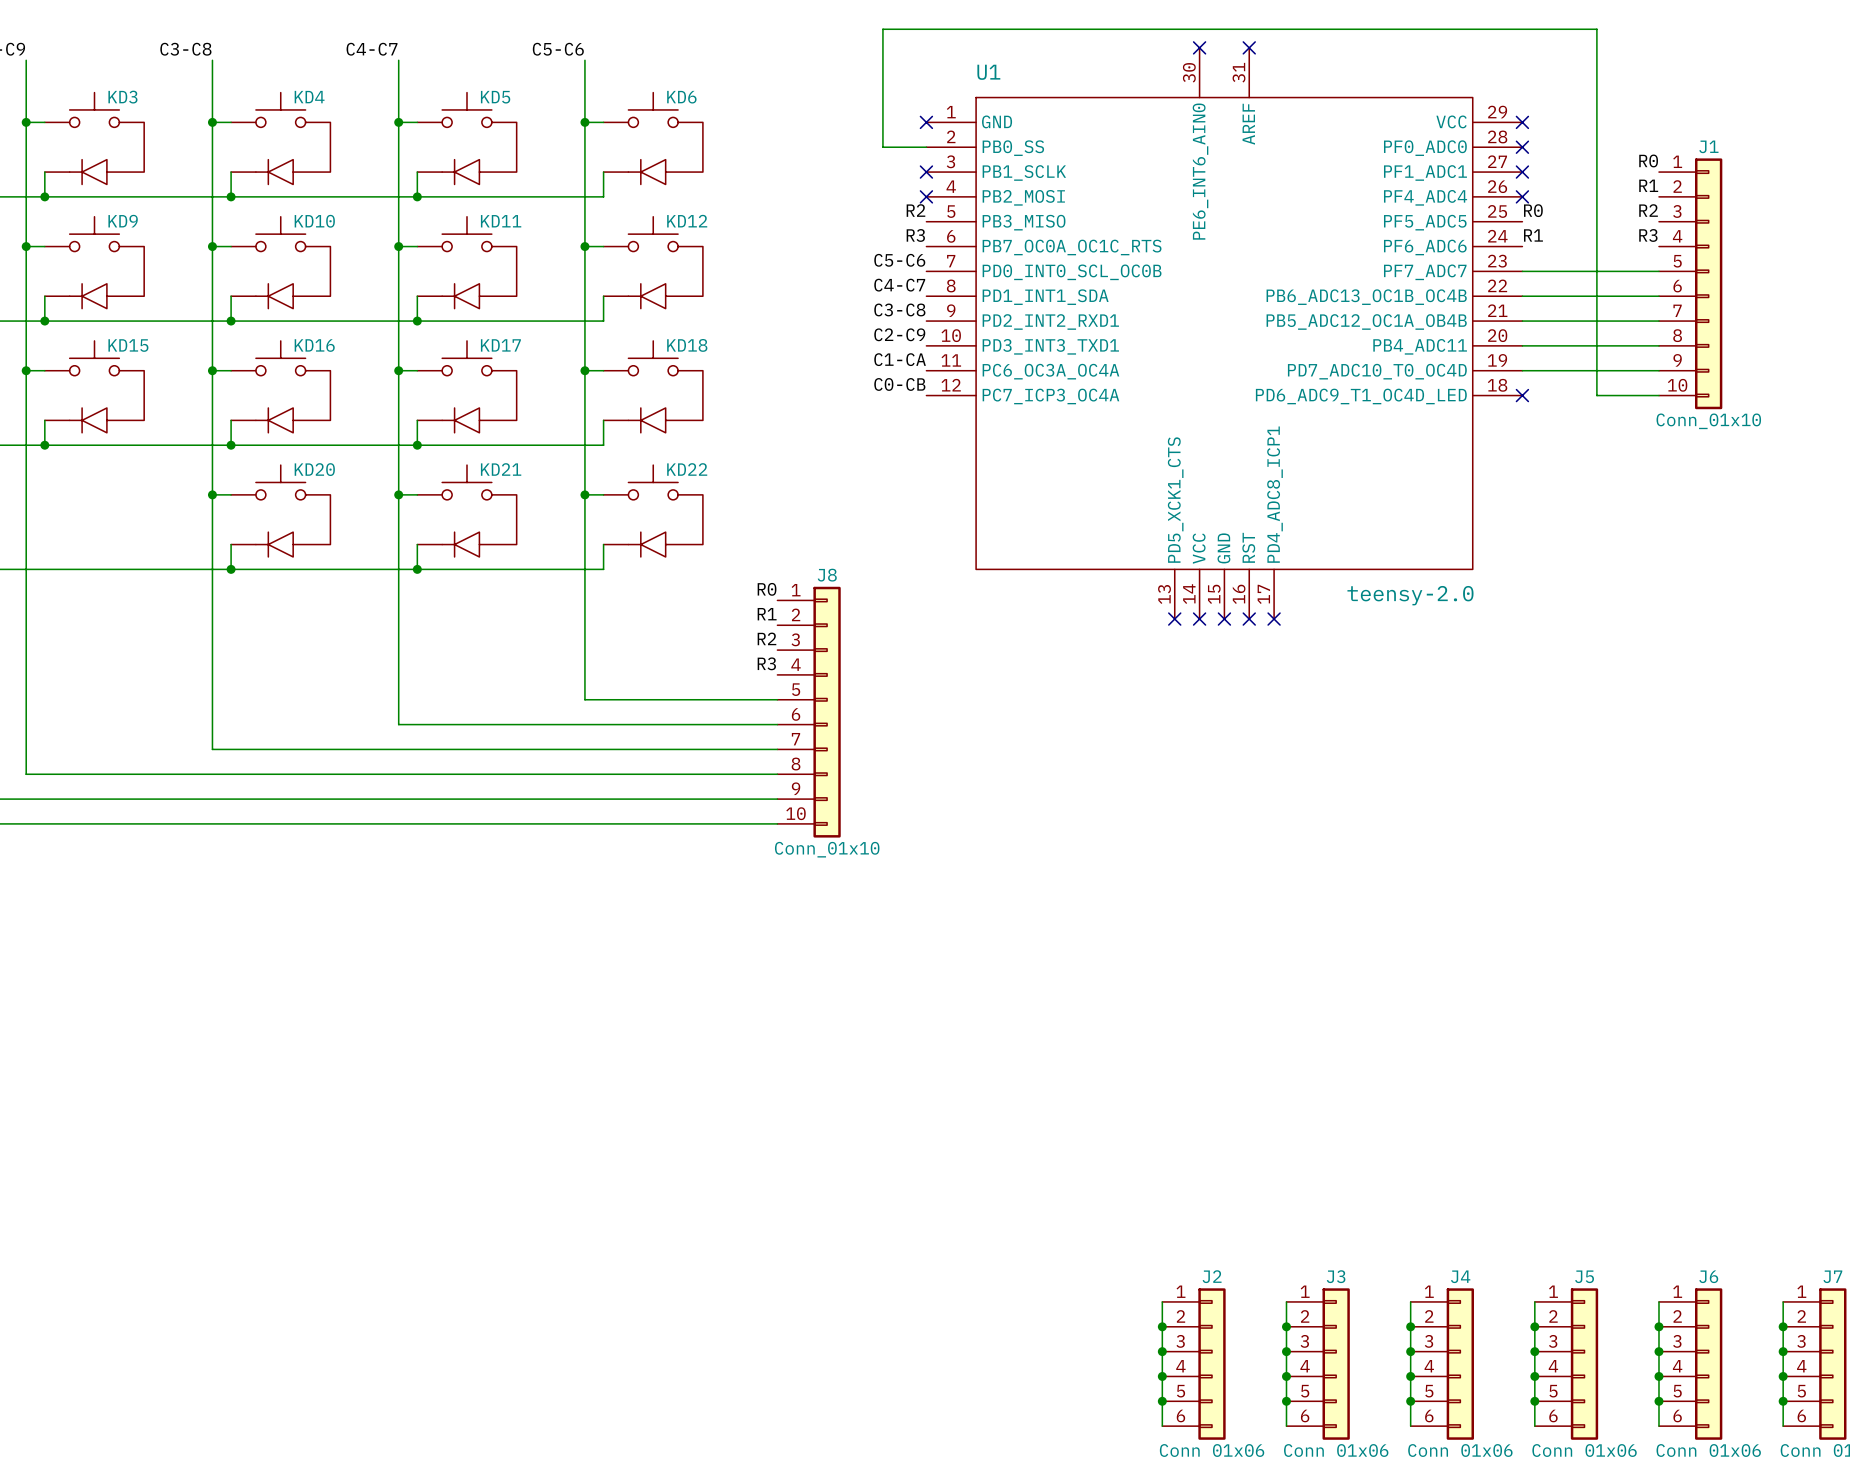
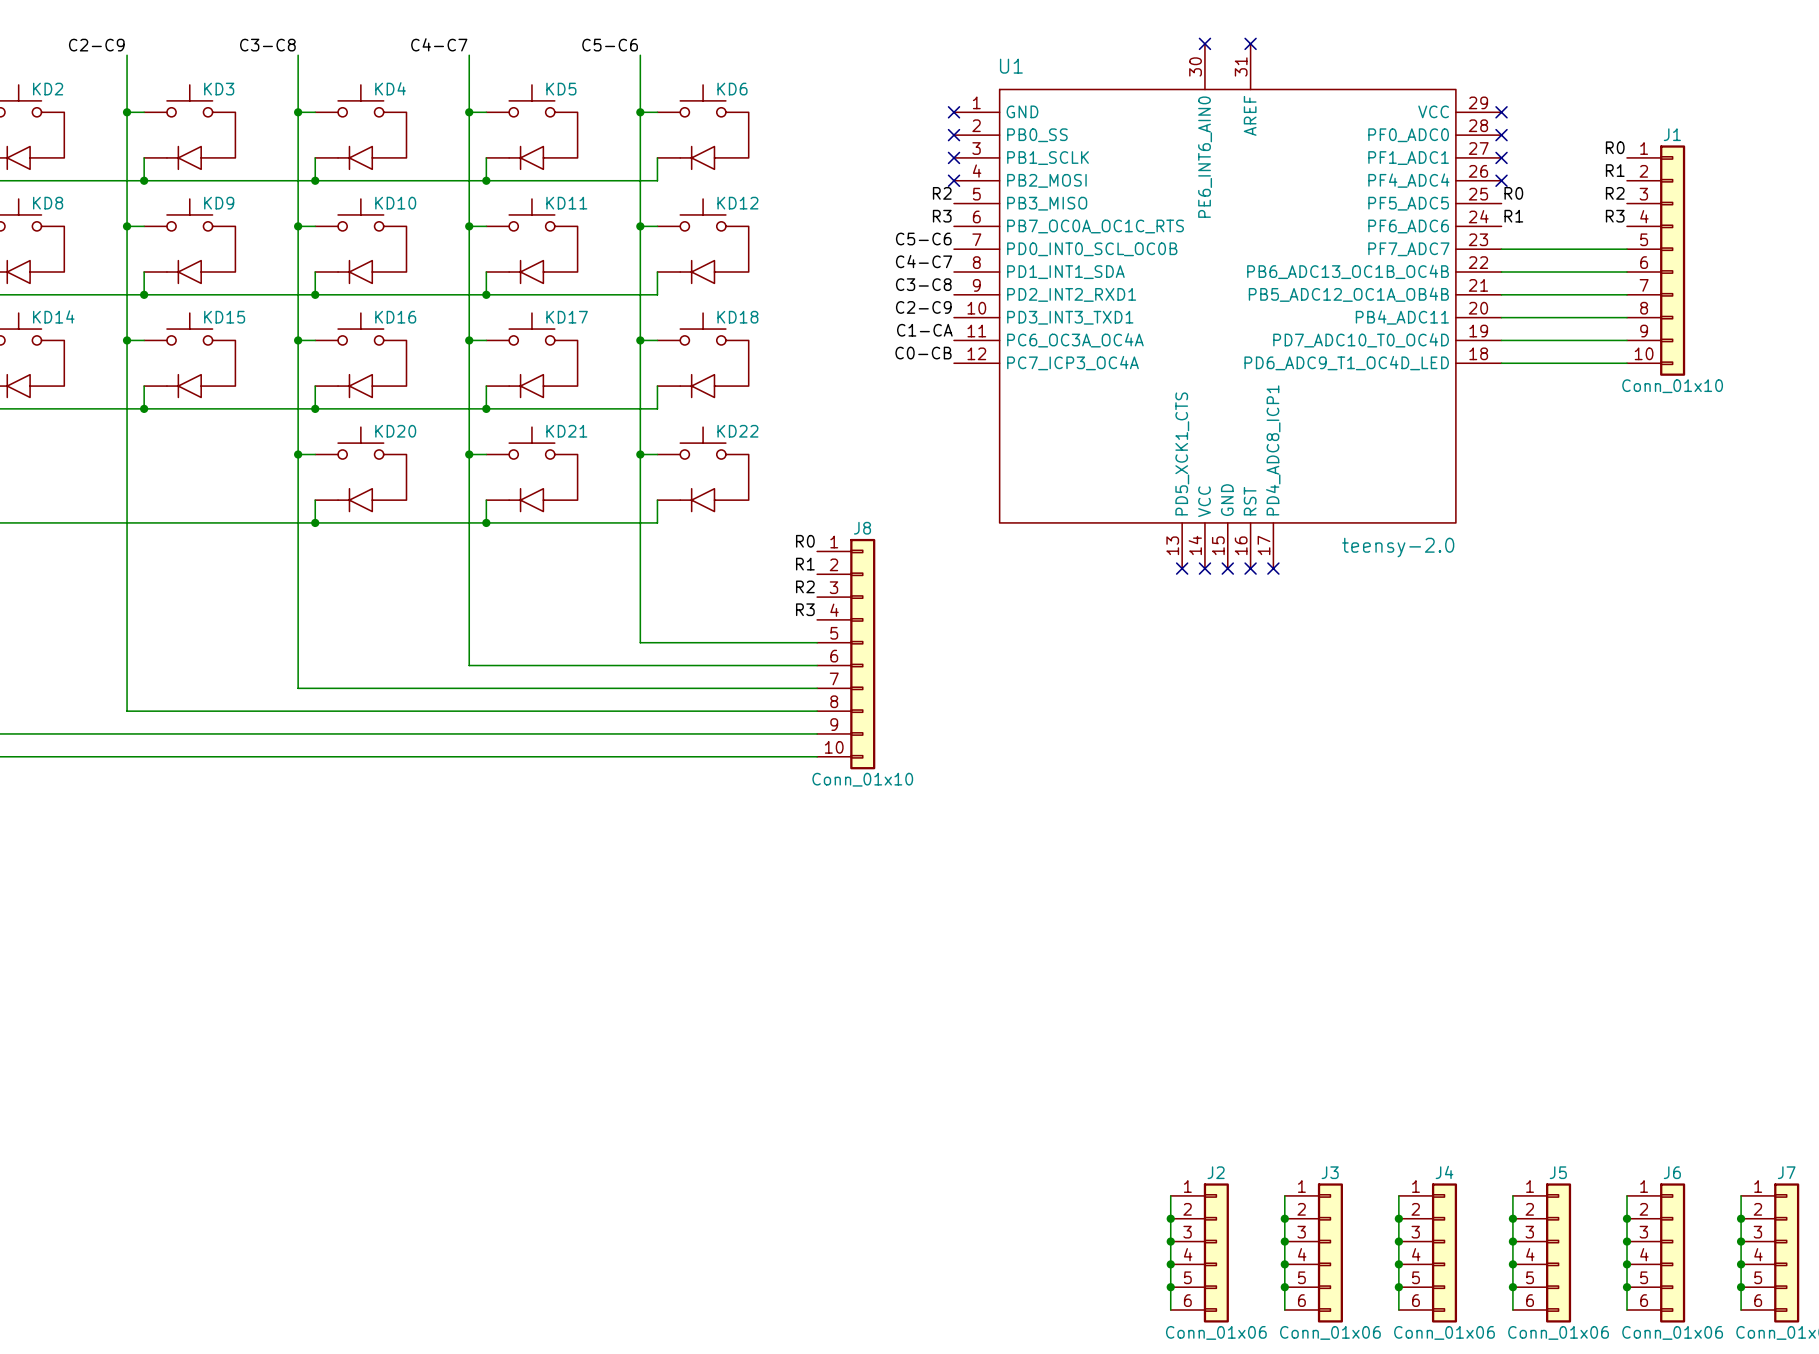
wire: (926, 147) (882, 147) (882, 29) (1596, 29) (1596, 395) -> (1501, 363) (1569, 363)
no-connect mark: none -> (954, 135)
no-connect mark: (1522, 395) -> none

